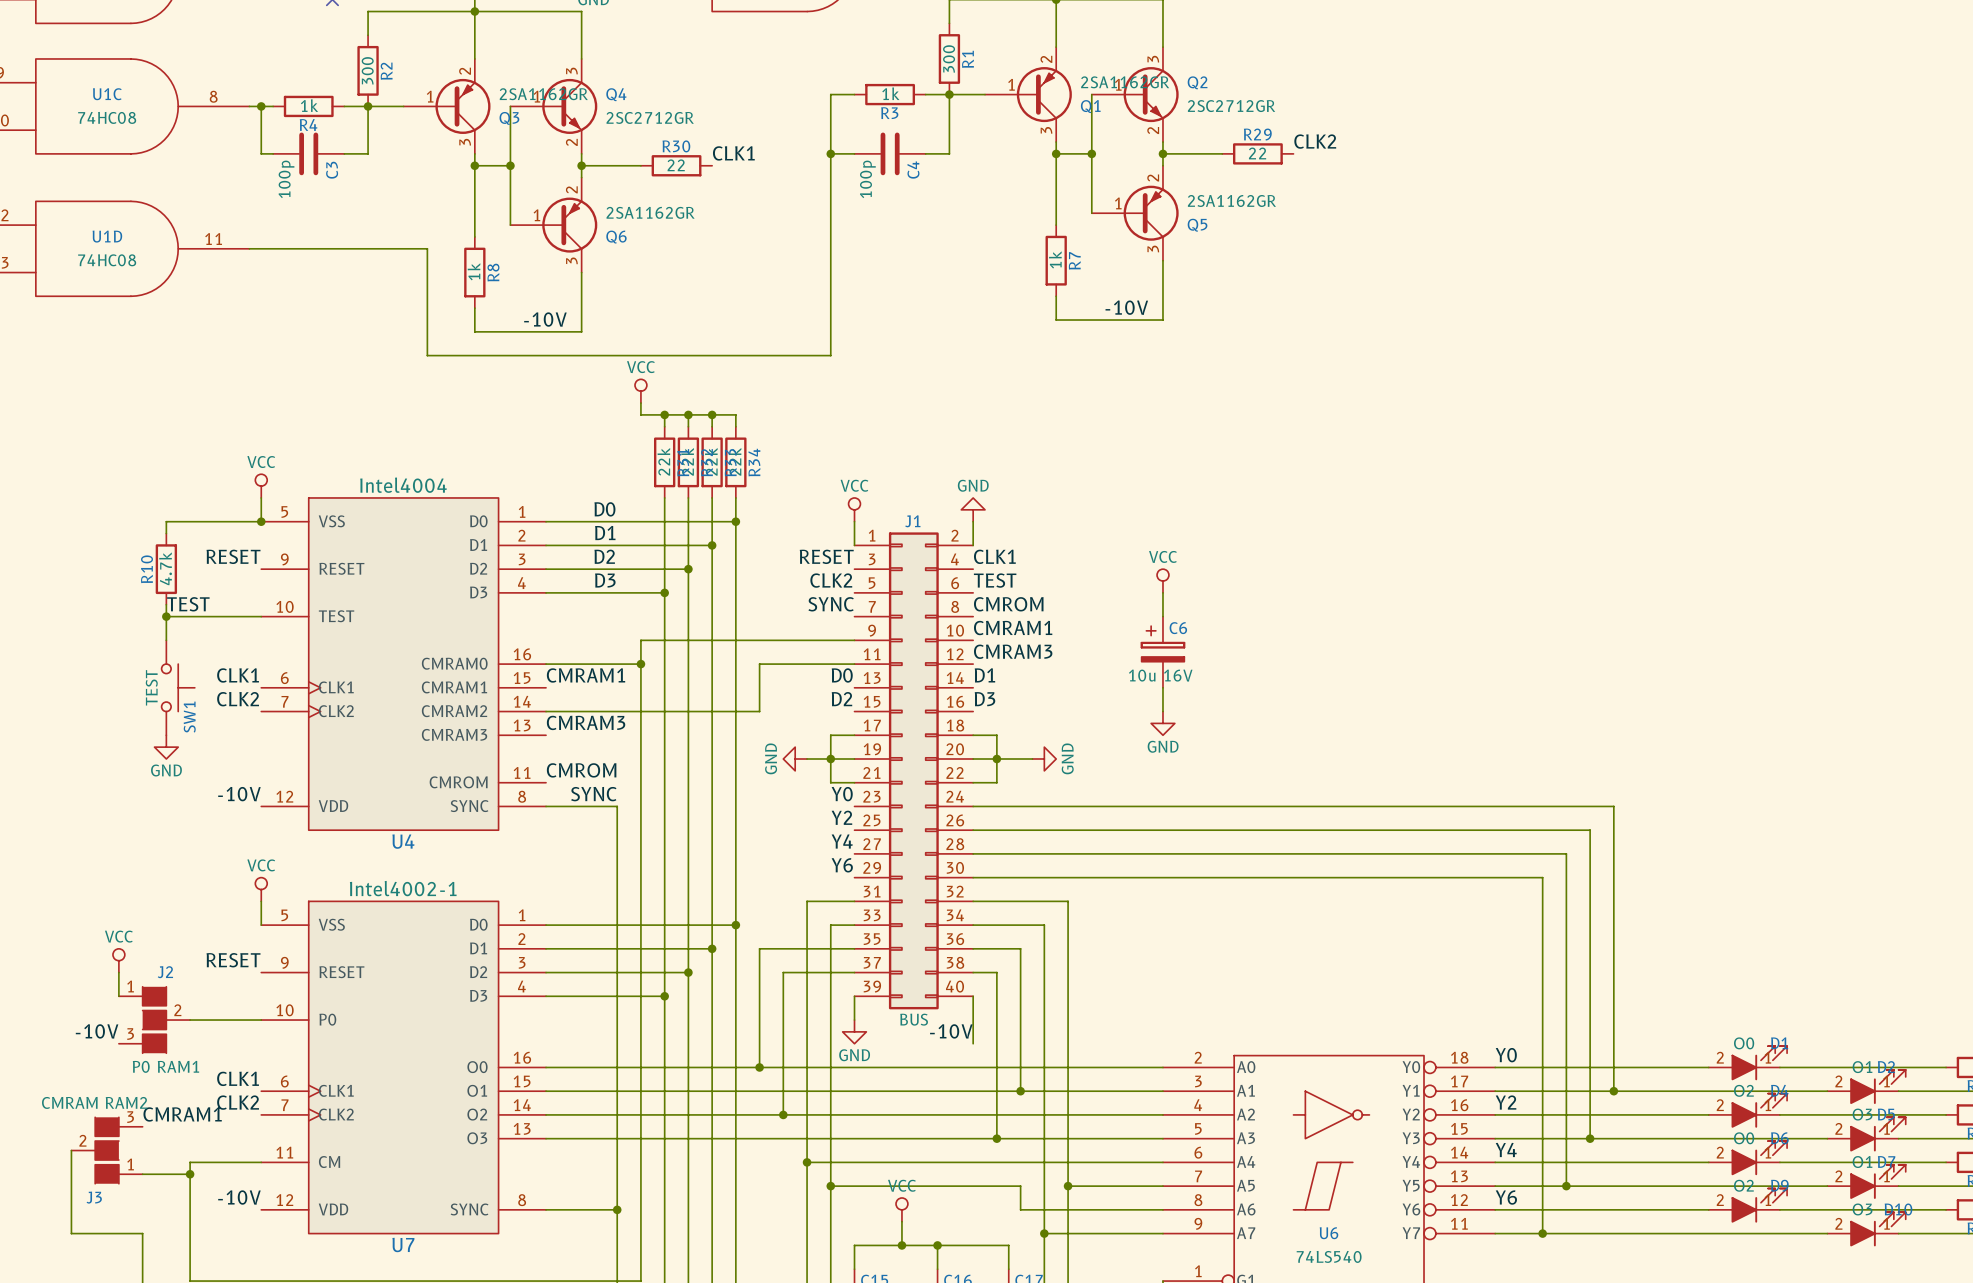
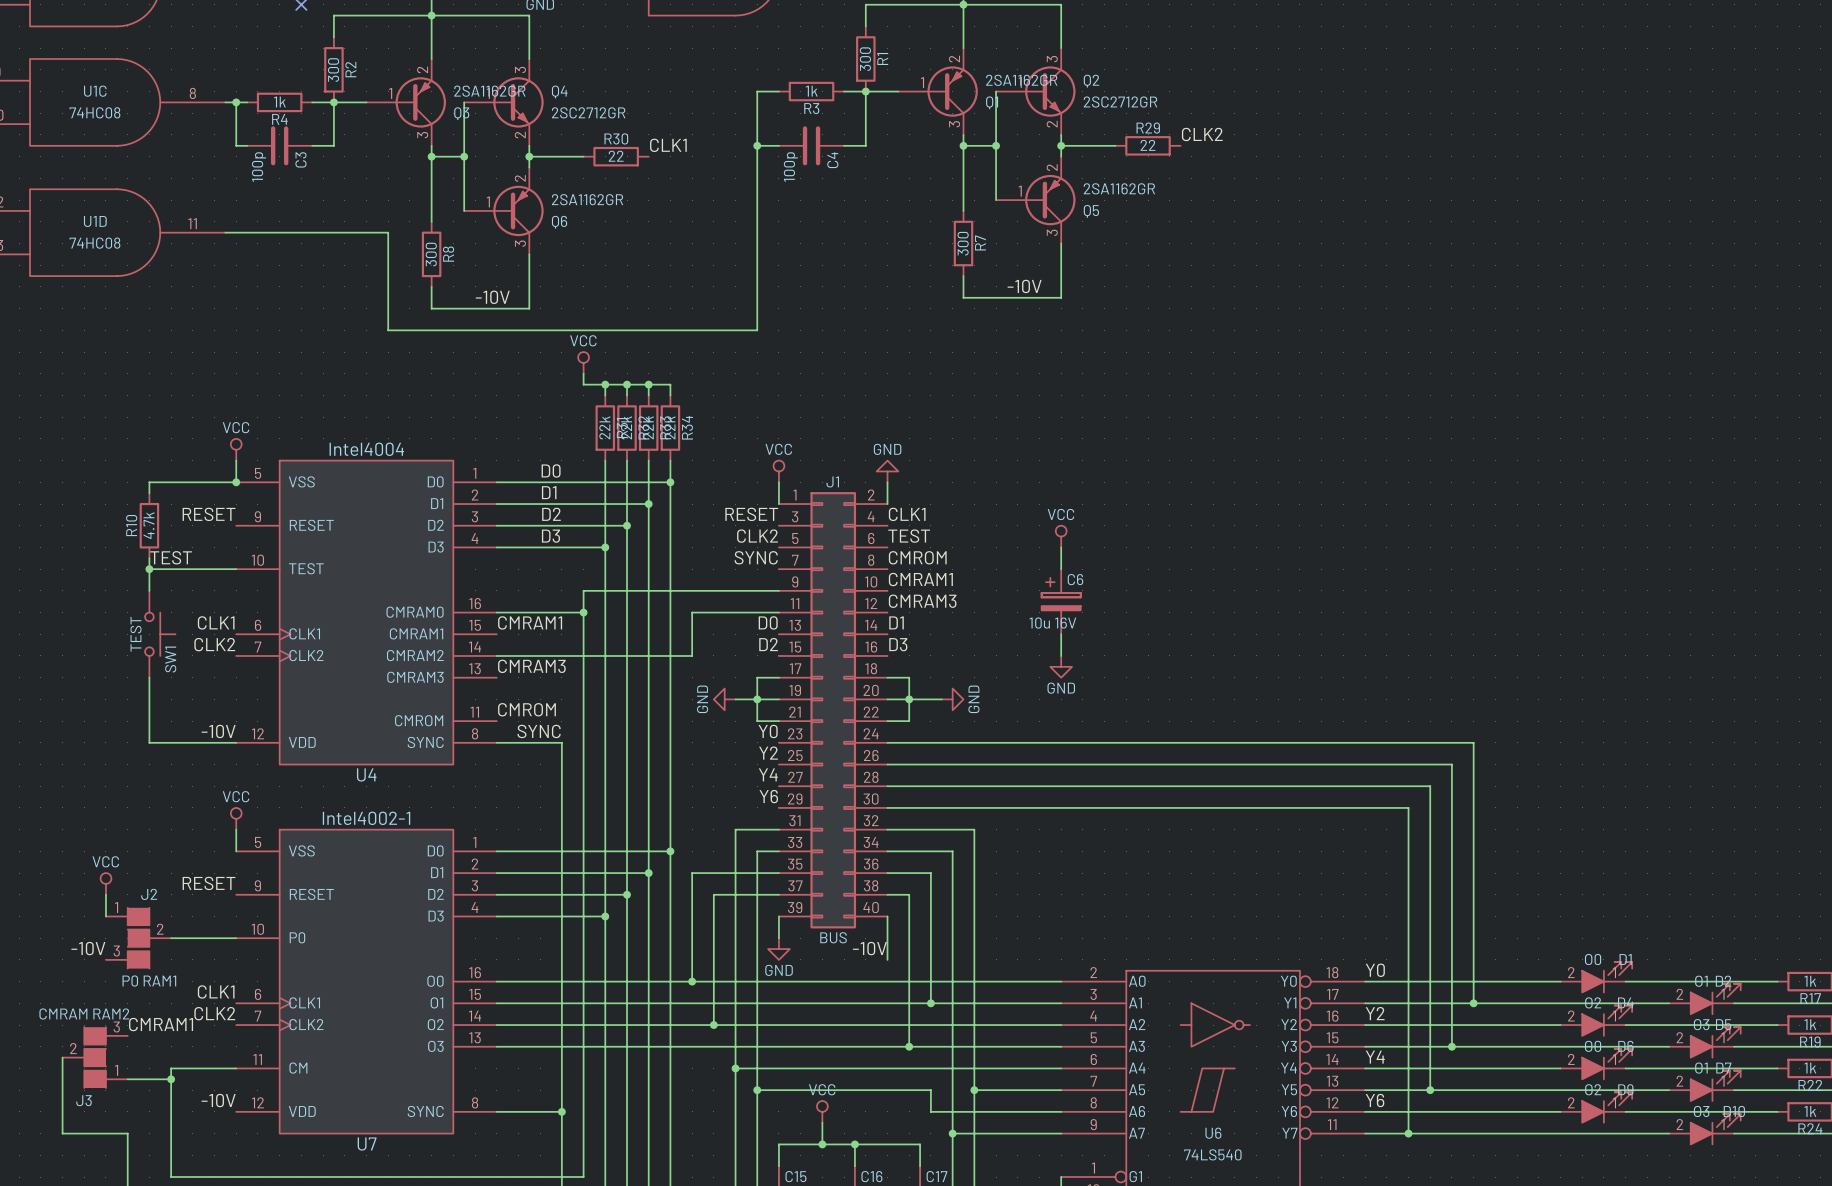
R7 value: 1k (1055, 259) -> 300 (963, 243)
R8 value: 1k (474, 271) -> 300 (431, 254)
wire: none -> (149, 677) (149, 742) (236, 742)
power symbol: GND (166, 747) -> none

